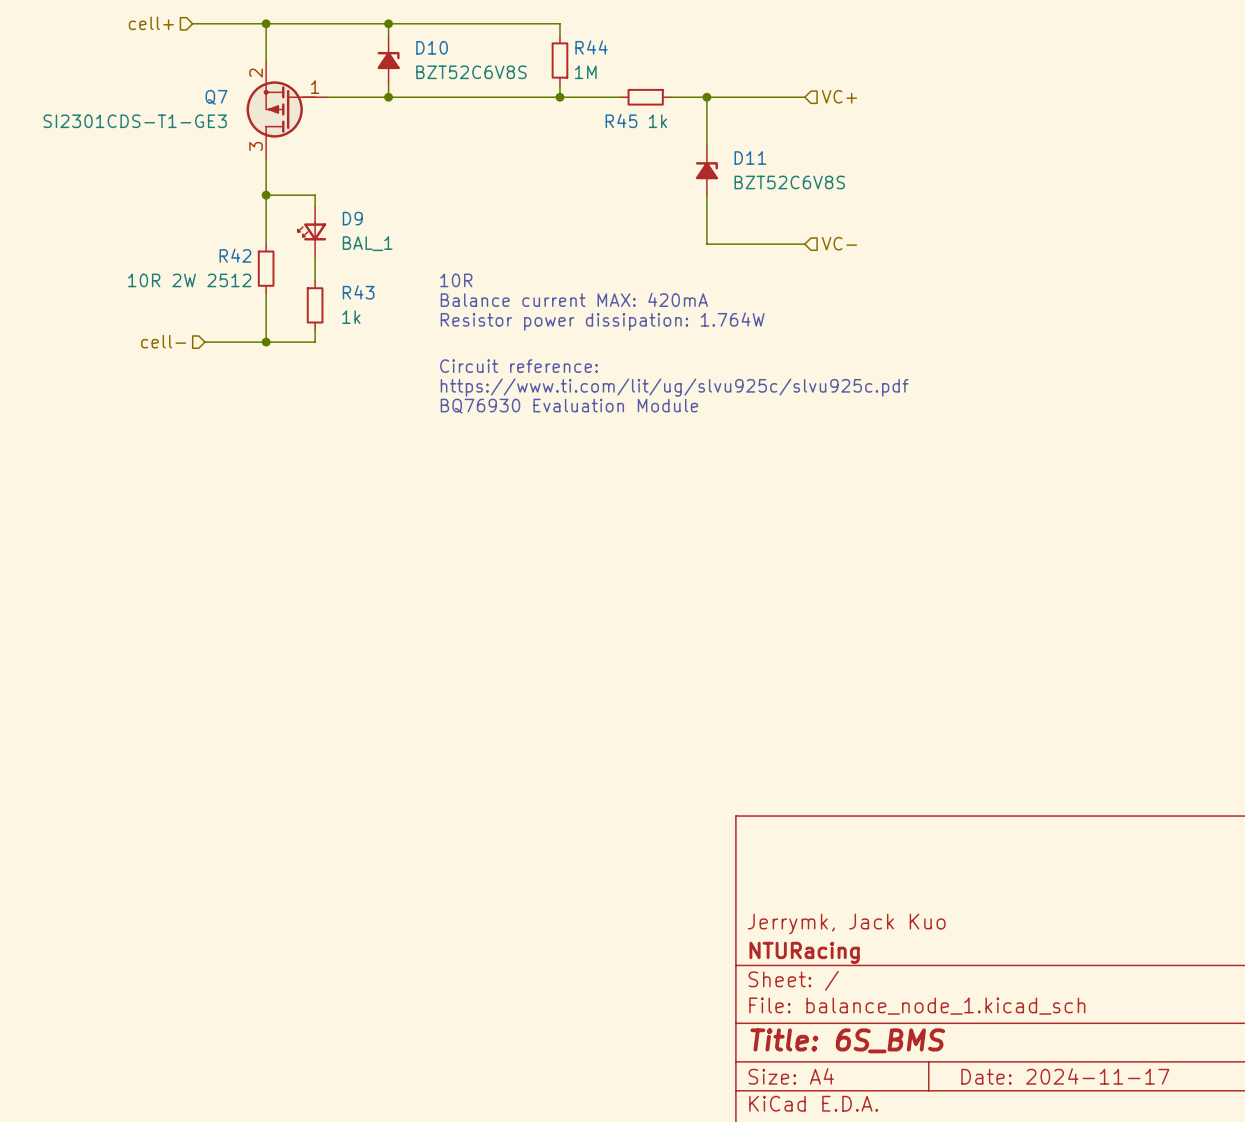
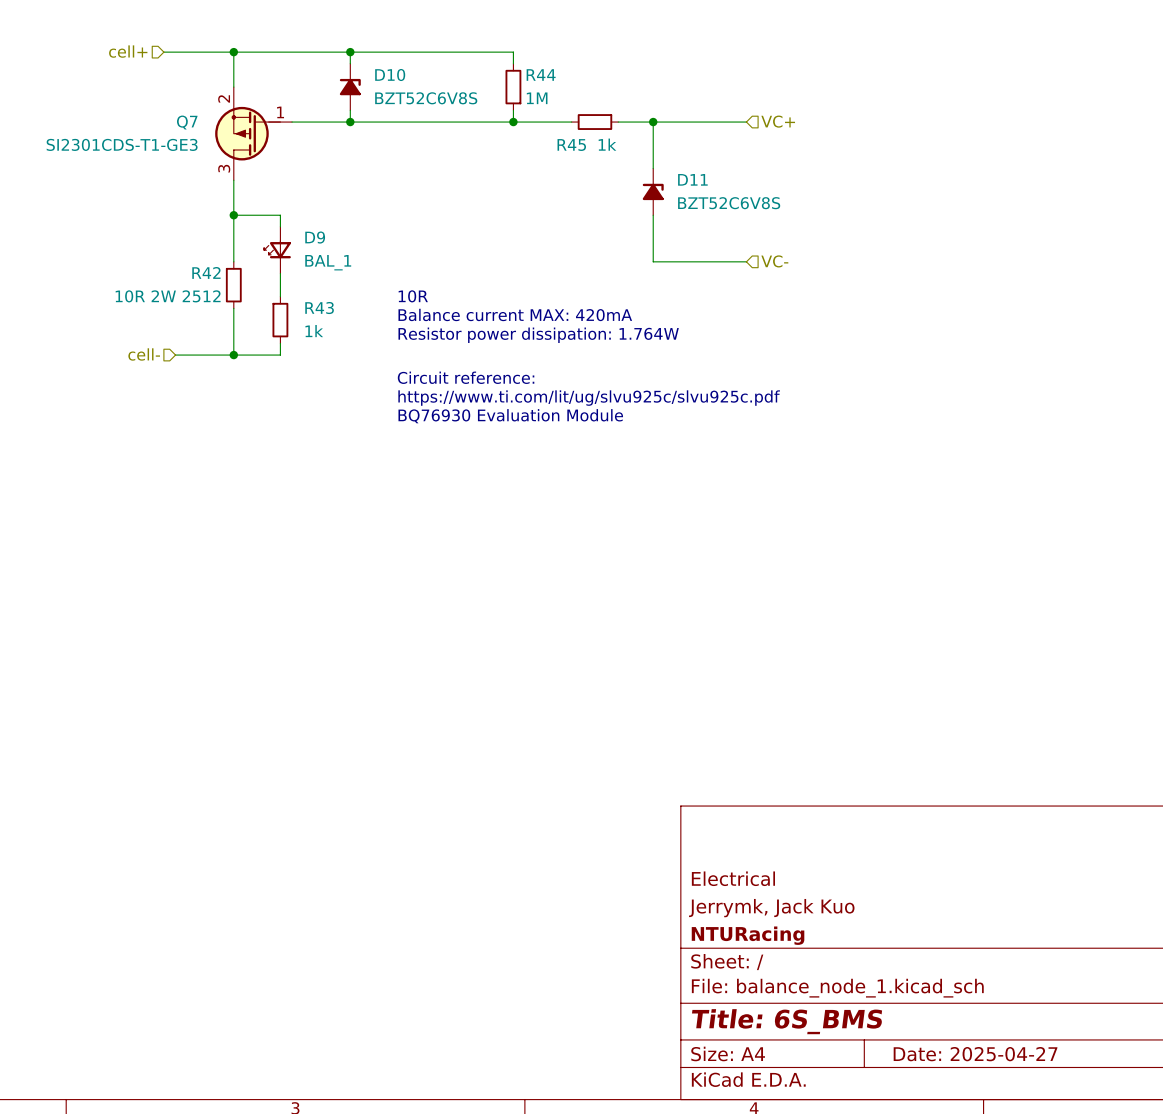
title block: none -> Electrical (733, 878)
title block: Date: 2024-11-17 (1065, 1076) -> Date: 2025-04-27 (975, 1054)

